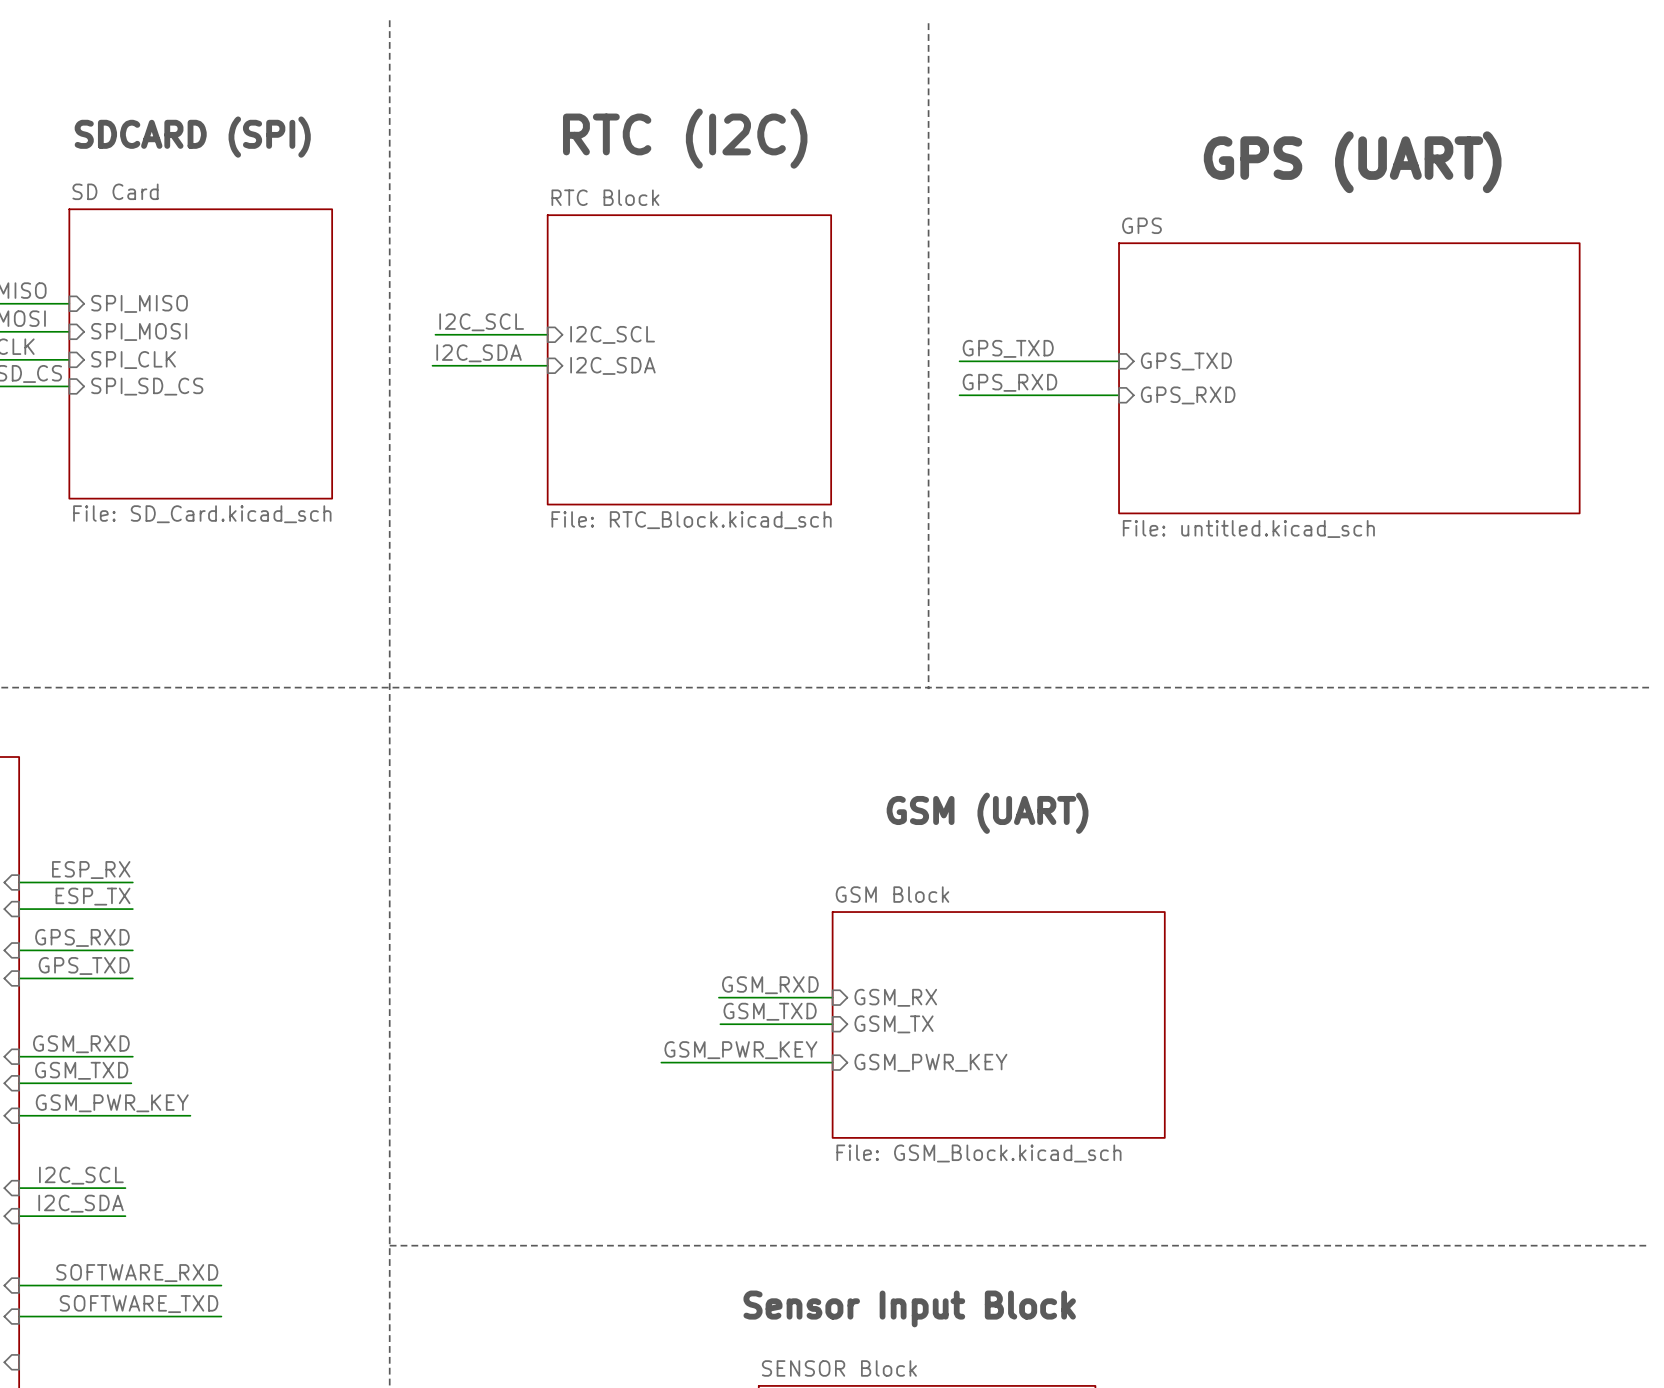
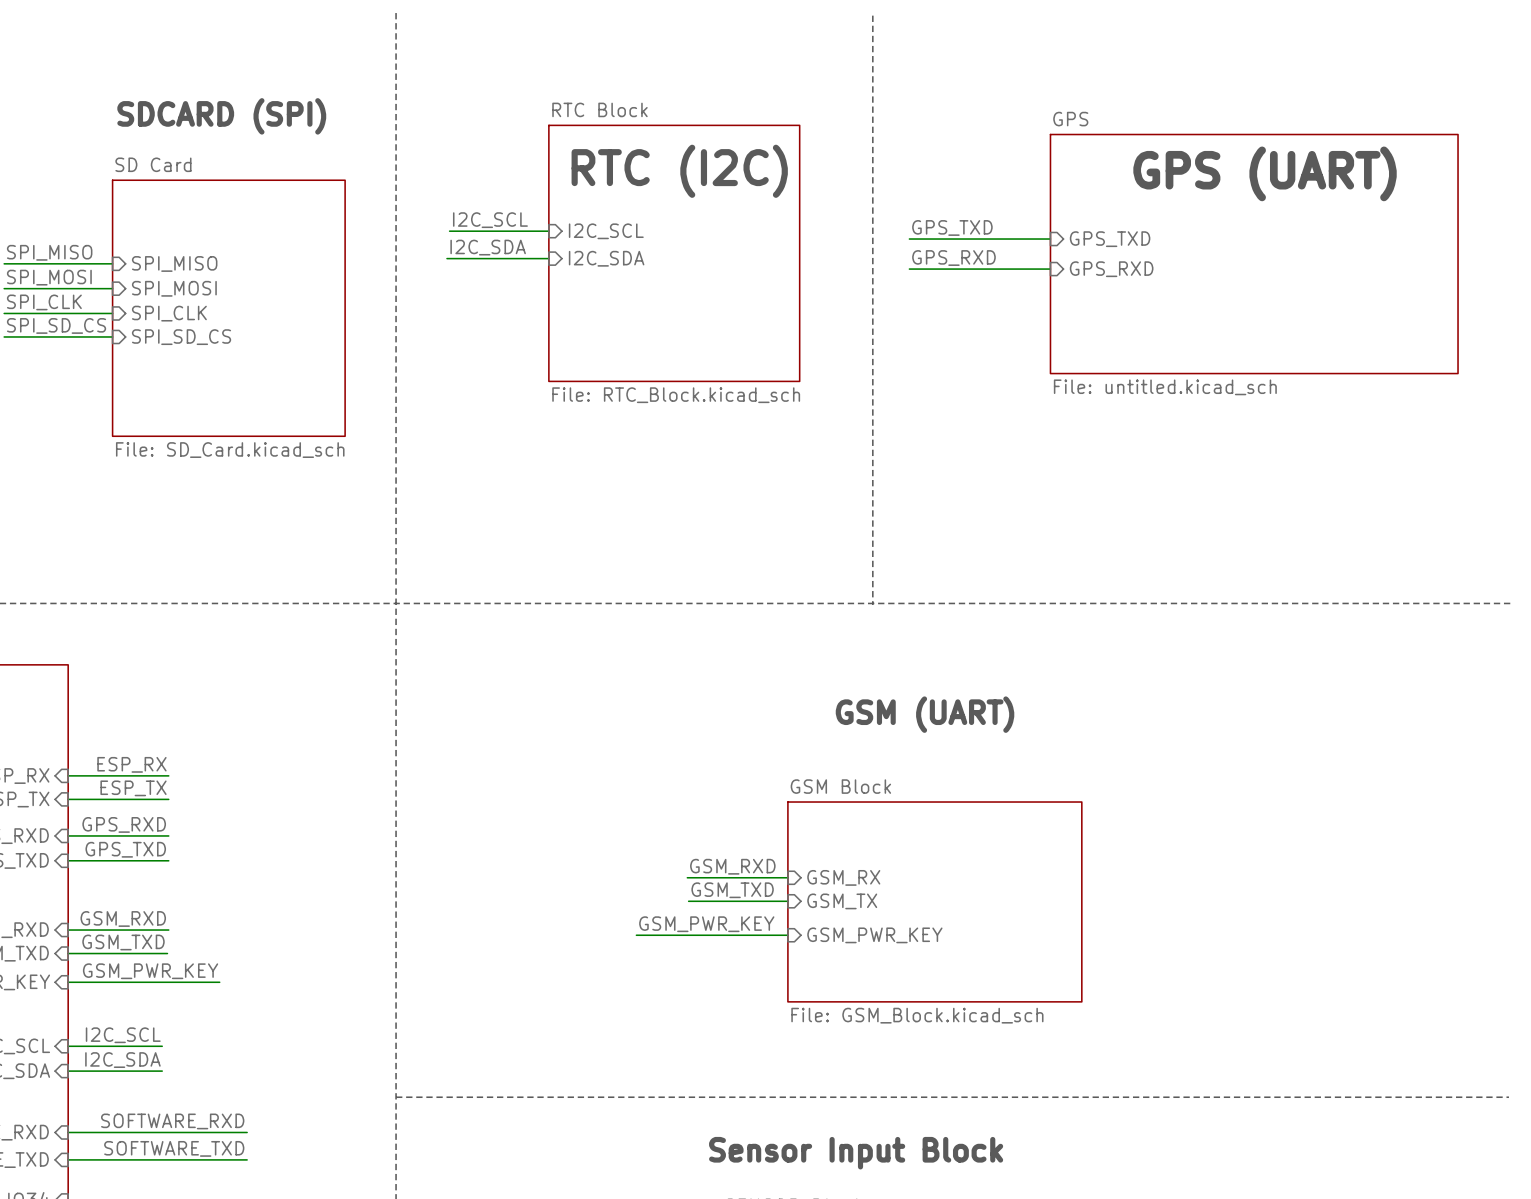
text position: RTC (I2C) (685, 138) -> RTC (I2C) (679, 171)
text position: GPS (UART) (1352, 162) -> GPS (UART) (1265, 173)
label position: I2C_SCL (481, 322) -> I2C_SCL (490, 220)
wire: (435, 334) (547, 334) -> (449, 231) (548, 231)
sheet pin position: I2C_SCL (612, 334) -> I2C_SCL (606, 231)
label position: GPS_TXD (1008, 348) -> GPS_TXD (952, 227)
label position: I2C_SDA (479, 353) -> I2C_SDA (488, 247)
sheet RTC Block position: (689, 359) -> (674, 253)
wire: (959, 361) (1119, 361) -> (909, 239) (1050, 239)
sheet pin position: GPS_TXD (1186, 361) -> GPS_TXD (1110, 239)
wire: (432, 365) (547, 365) -> (446, 258) (548, 258)
sheet pin position: I2C_SDA (612, 365) -> I2C_SDA (606, 258)
sheet GPS position: (1349, 378) -> (1254, 254)
label position: GPS_RXD (1009, 382) -> GPS_RXD (953, 258)
wire: (959, 395) (1119, 395) -> (909, 269) (1050, 269)
sheet pin position: GPS_RXD (1188, 395) -> GPS_RXD (1111, 269)

